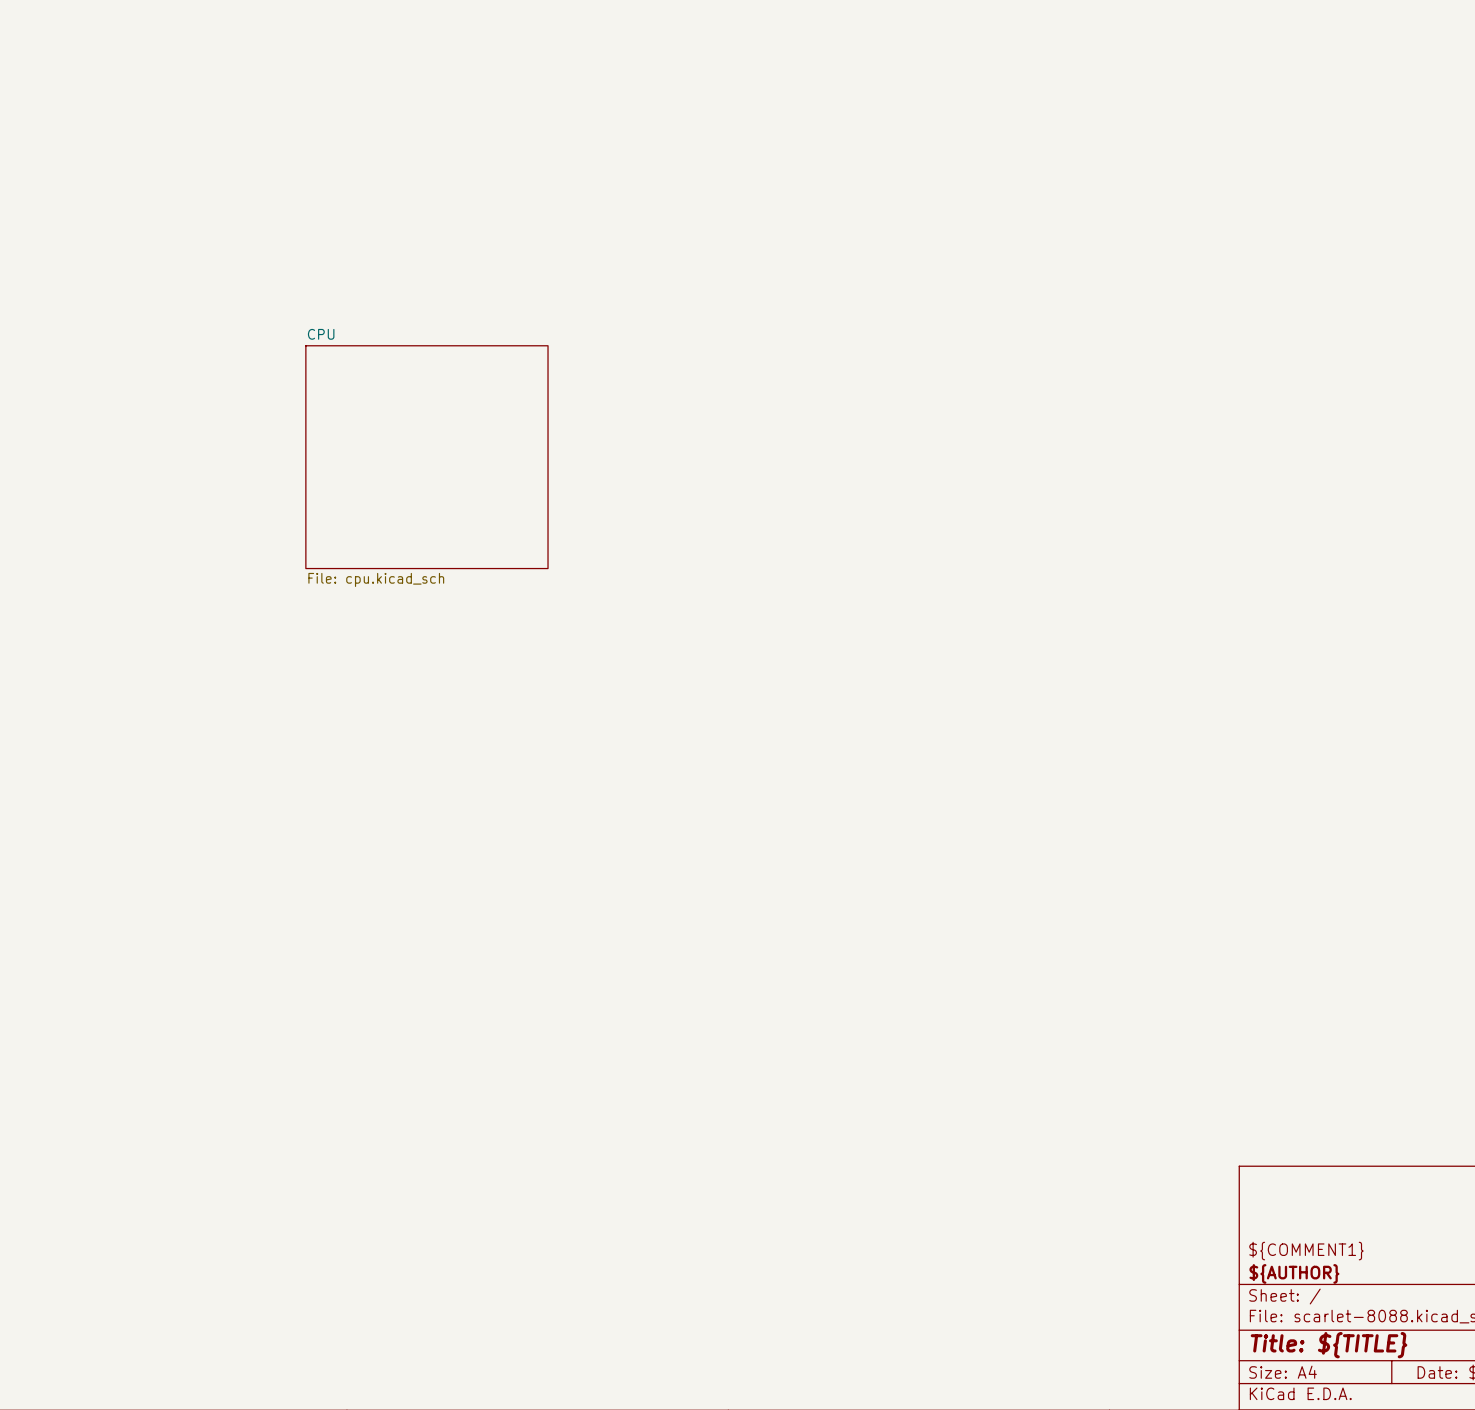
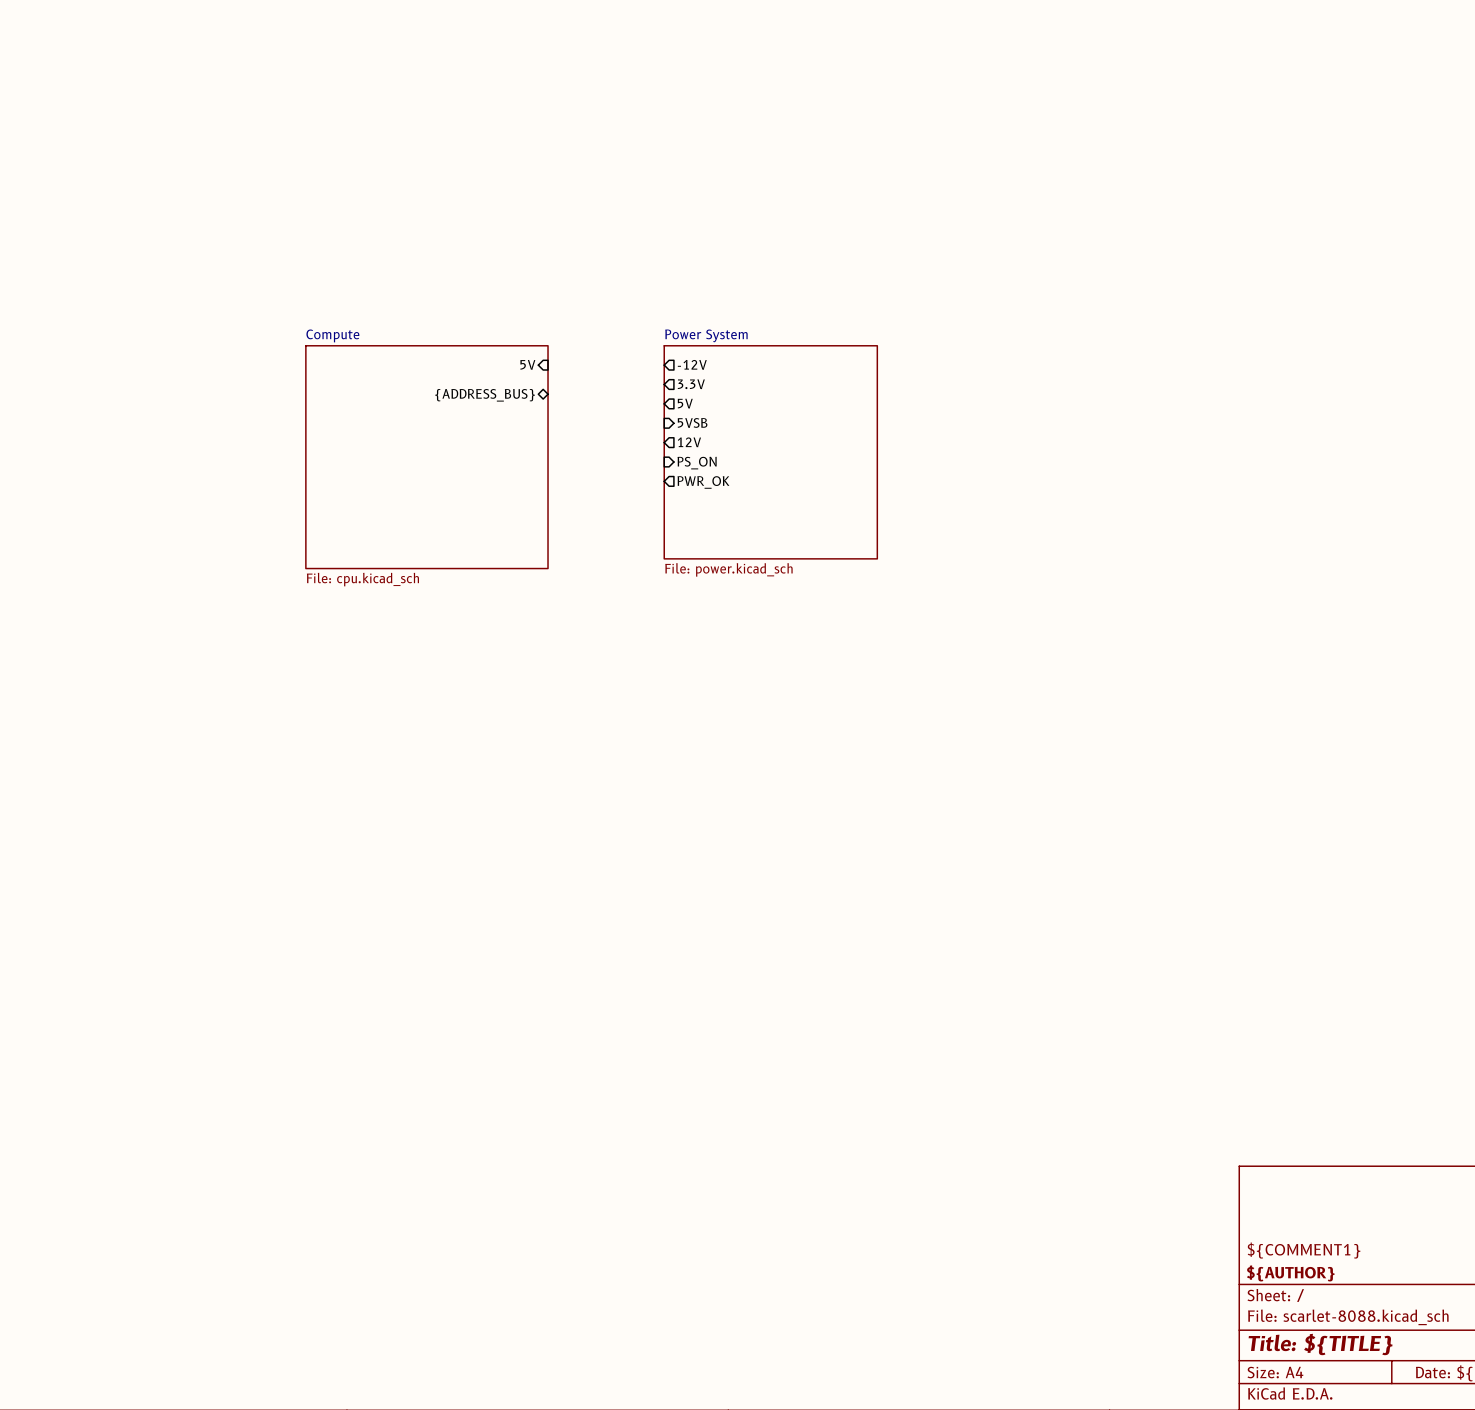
sheet CPU name: CPU (321, 334) -> Compute (332, 335)
sheet pin: none -> 5V (527, 364)
sheet pin: none -> -12V (692, 364)
sheet pin: none -> 3.3V (691, 384)
sheet pin: none -> {ADDRESS_BUS} (485, 395)
sheet pin: none -> 5V (685, 403)
sheet pin: none -> 5VSB (692, 422)
sheet pin: none -> 12V (689, 442)
sheet Power System: none -> File: power.kicad_sch (770, 452)
sheet pin: none -> PS_ON (697, 463)
sheet pin: none -> PWR_OK (703, 482)

